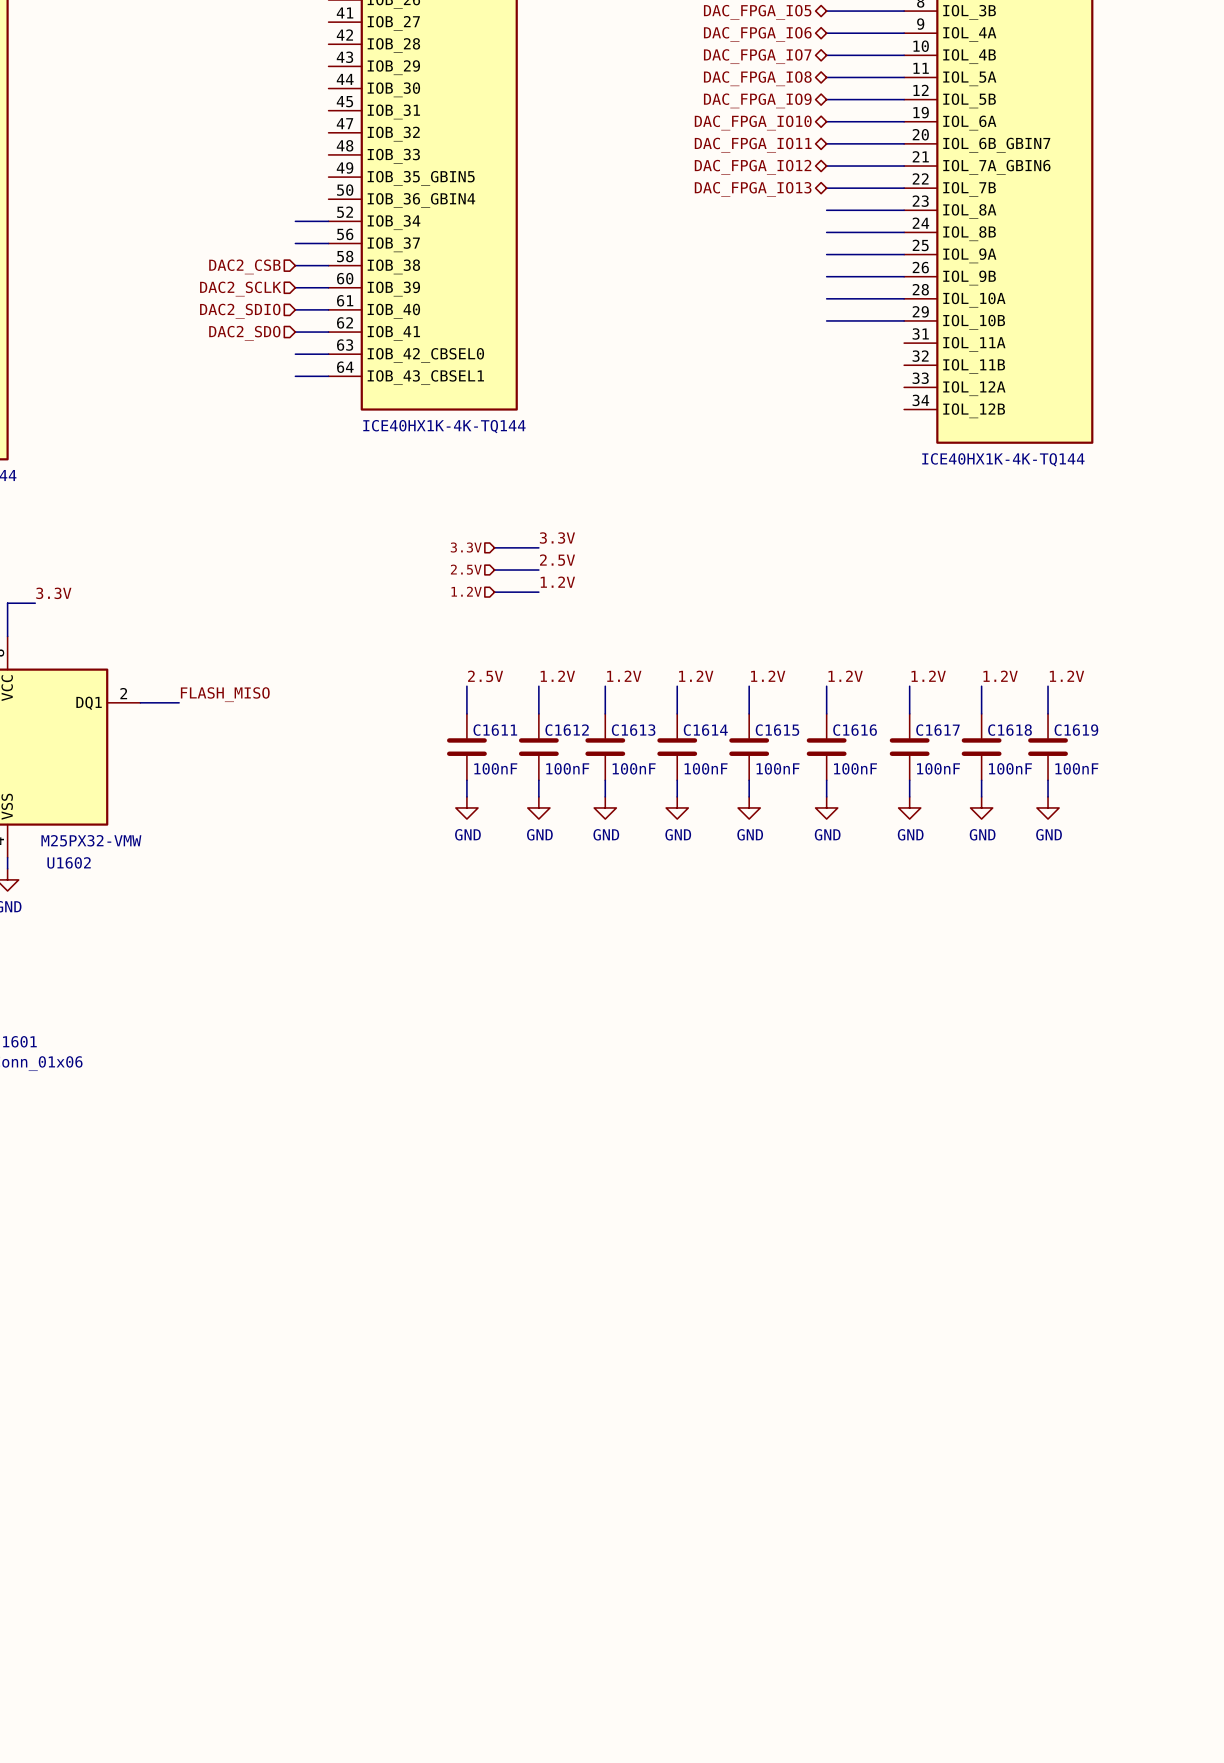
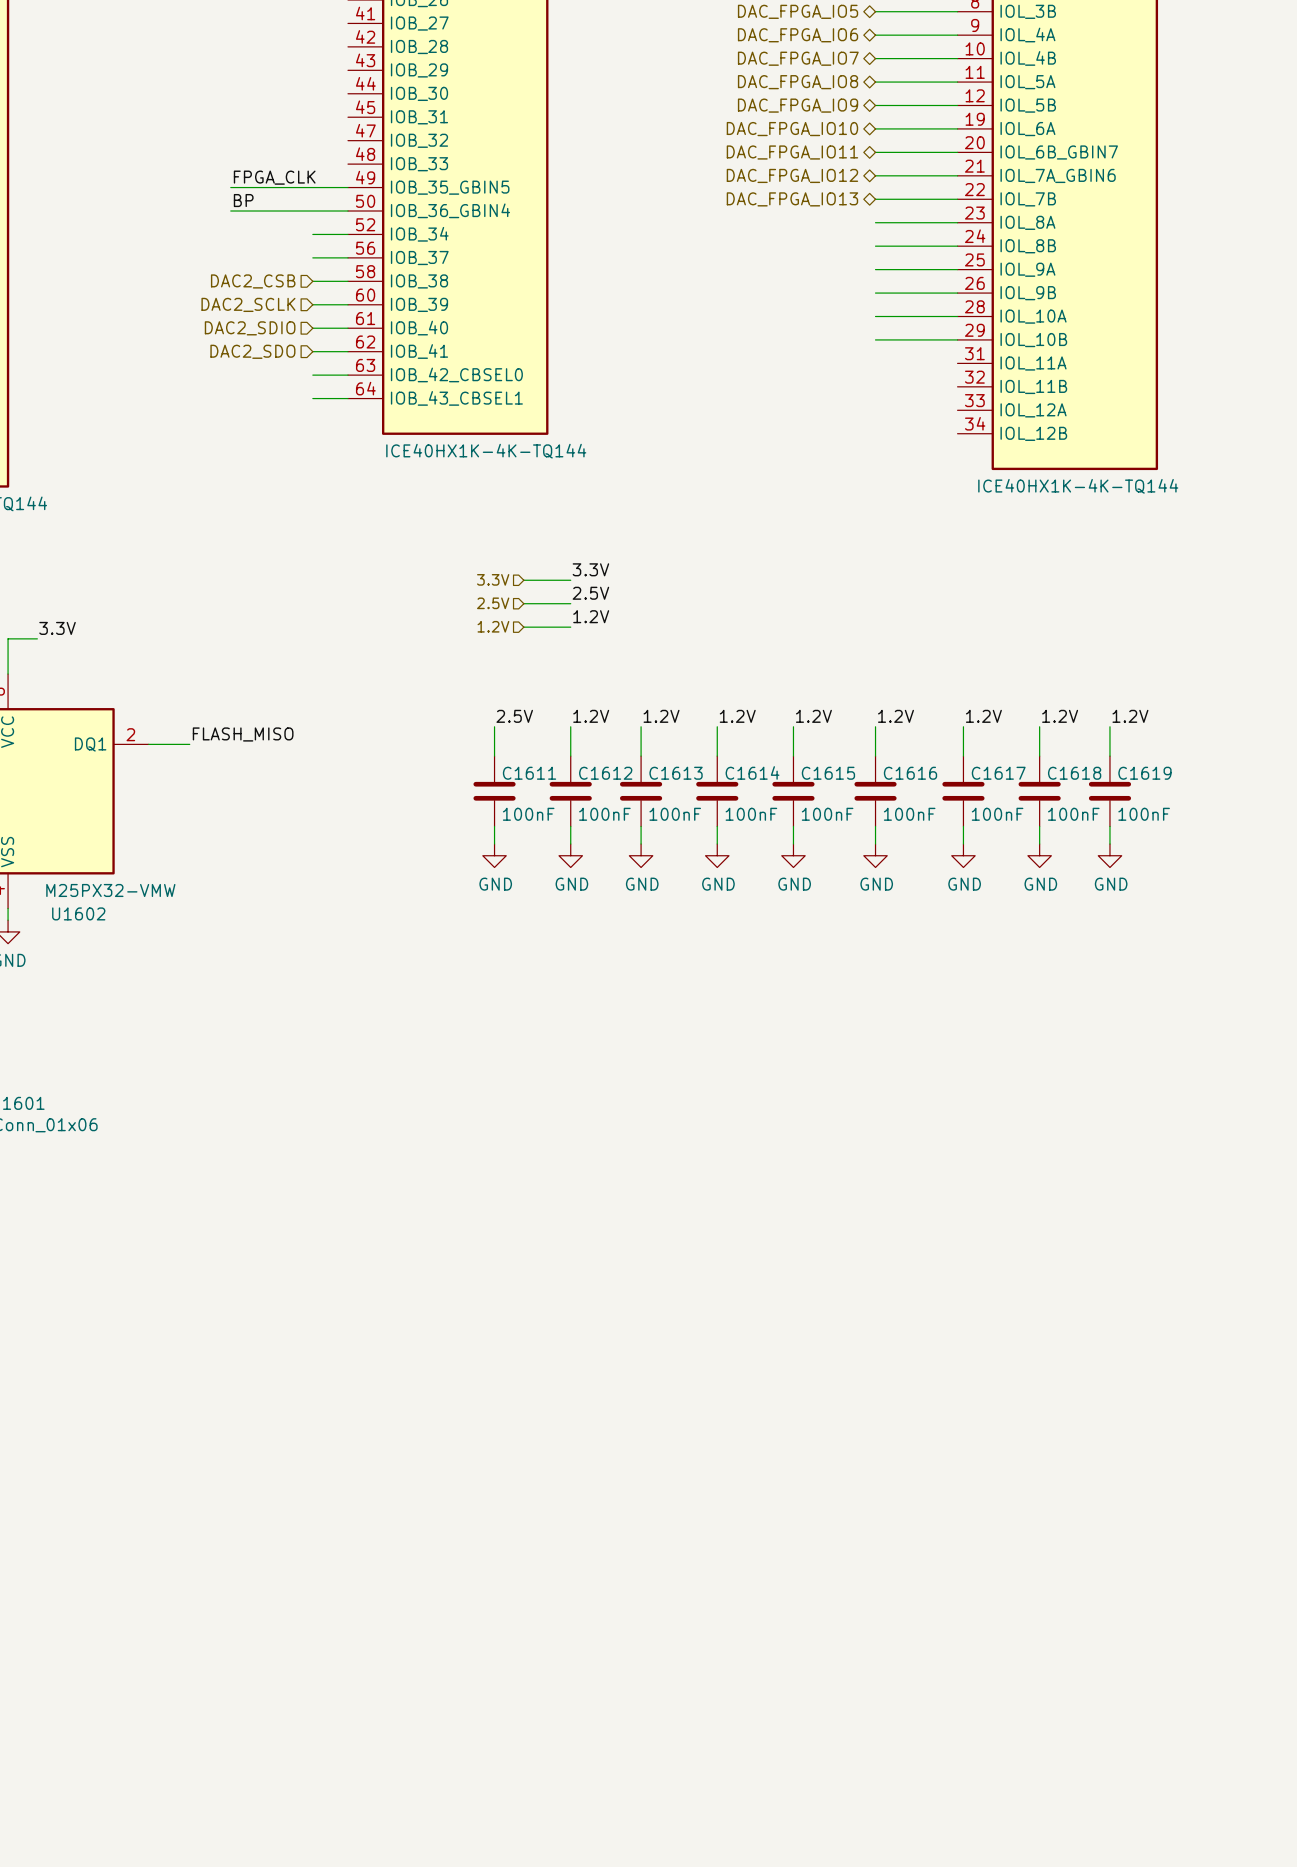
label: none -> FPGA_CLK (274, 177)
wire: none -> (230, 187) (348, 187)
label: none -> BP (243, 200)
wire: none -> (230, 211) (348, 211)

